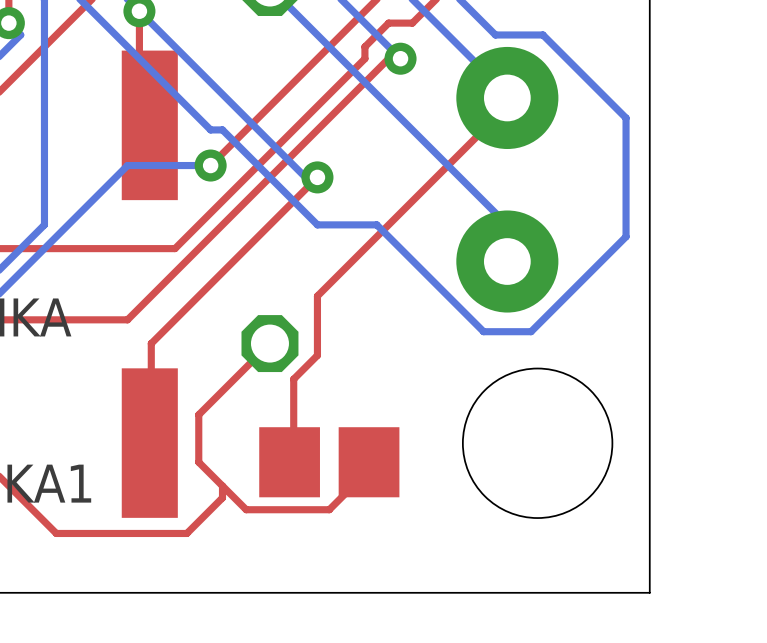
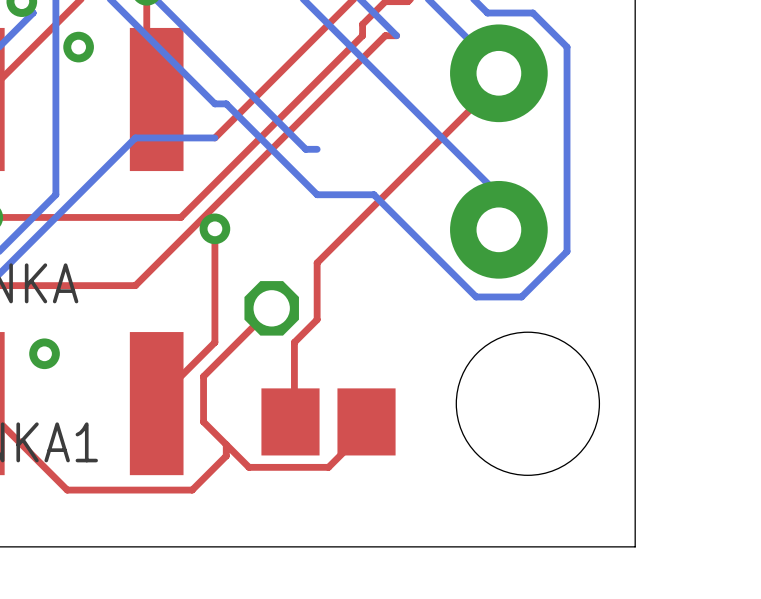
via: (400, 58) -> none
via: none -> (78, 47)
bottom track: (578, 70) (626, 118) (626, 236) (578, 284) -> (567, 47) (567, 251)
via: (210, 165) -> none
top track: (317, 177) (151, 343) (151, 438) -> (214, 228) (214, 342) (158, 399)
via: (317, 177) -> none
via: none -> (214, 228)
via: none -> (44, 353)

